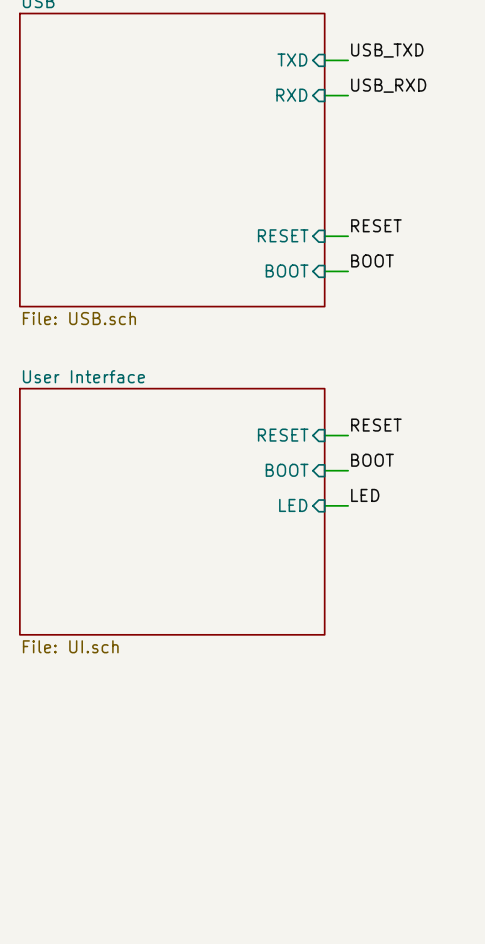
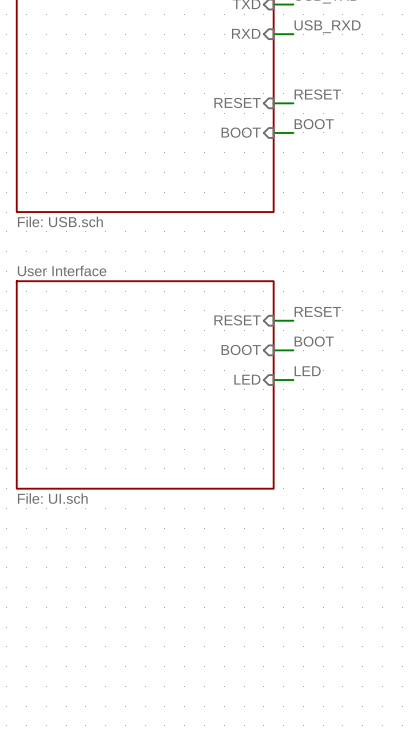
label position: RESET (376, 225) -> RESET (317, 94)
sheet pin position: RESET (283, 235) -> RESET (237, 102)
wire: (324, 236) (348, 236) -> (273, 103) (293, 103)
label position: BOOT (372, 260) -> BOOT (314, 124)
sheet pin position: BOOT (287, 270) -> BOOT (241, 132)
wire: (324, 271) (348, 271) -> (273, 132) (293, 132)

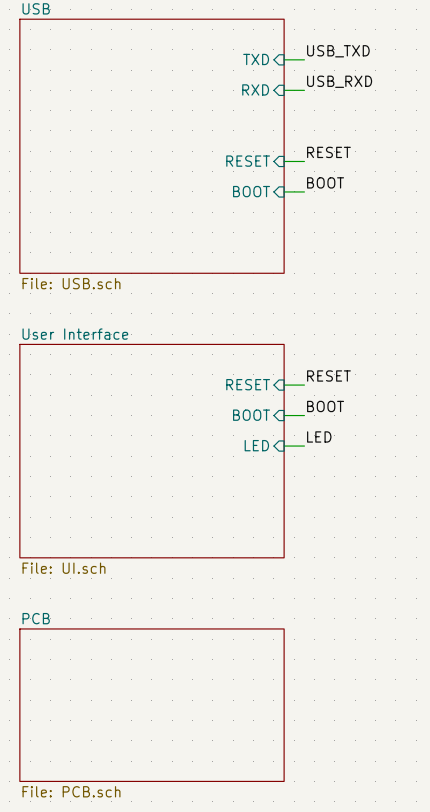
sheet PCB: none -> File: PCB.sch (151, 705)

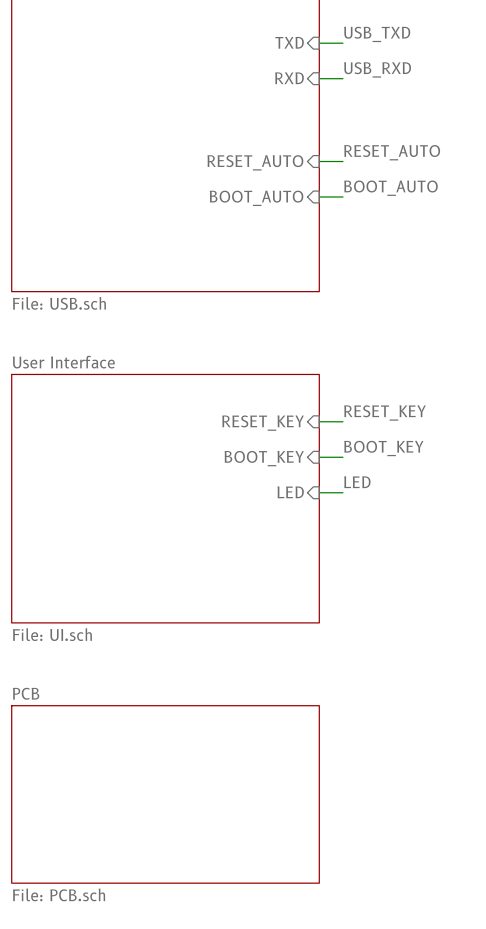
label: RESET (328, 152) -> RESET_AUTO (392, 152)
sheet pin: RESET (248, 161) -> RESET_AUTO (255, 162)
label: BOOT (325, 182) -> BOOT_AUTO (390, 188)
sheet pin: BOOT (251, 191) -> BOOT_AUTO (256, 198)
label: RESET (328, 375) -> RESET_KEY (384, 412)
sheet pin: RESET (248, 384) -> RESET_KEY (263, 423)
label: BOOT (325, 406) -> BOOT_KEY (383, 448)
sheet pin: BOOT (251, 415) -> BOOT_KEY (264, 458)

